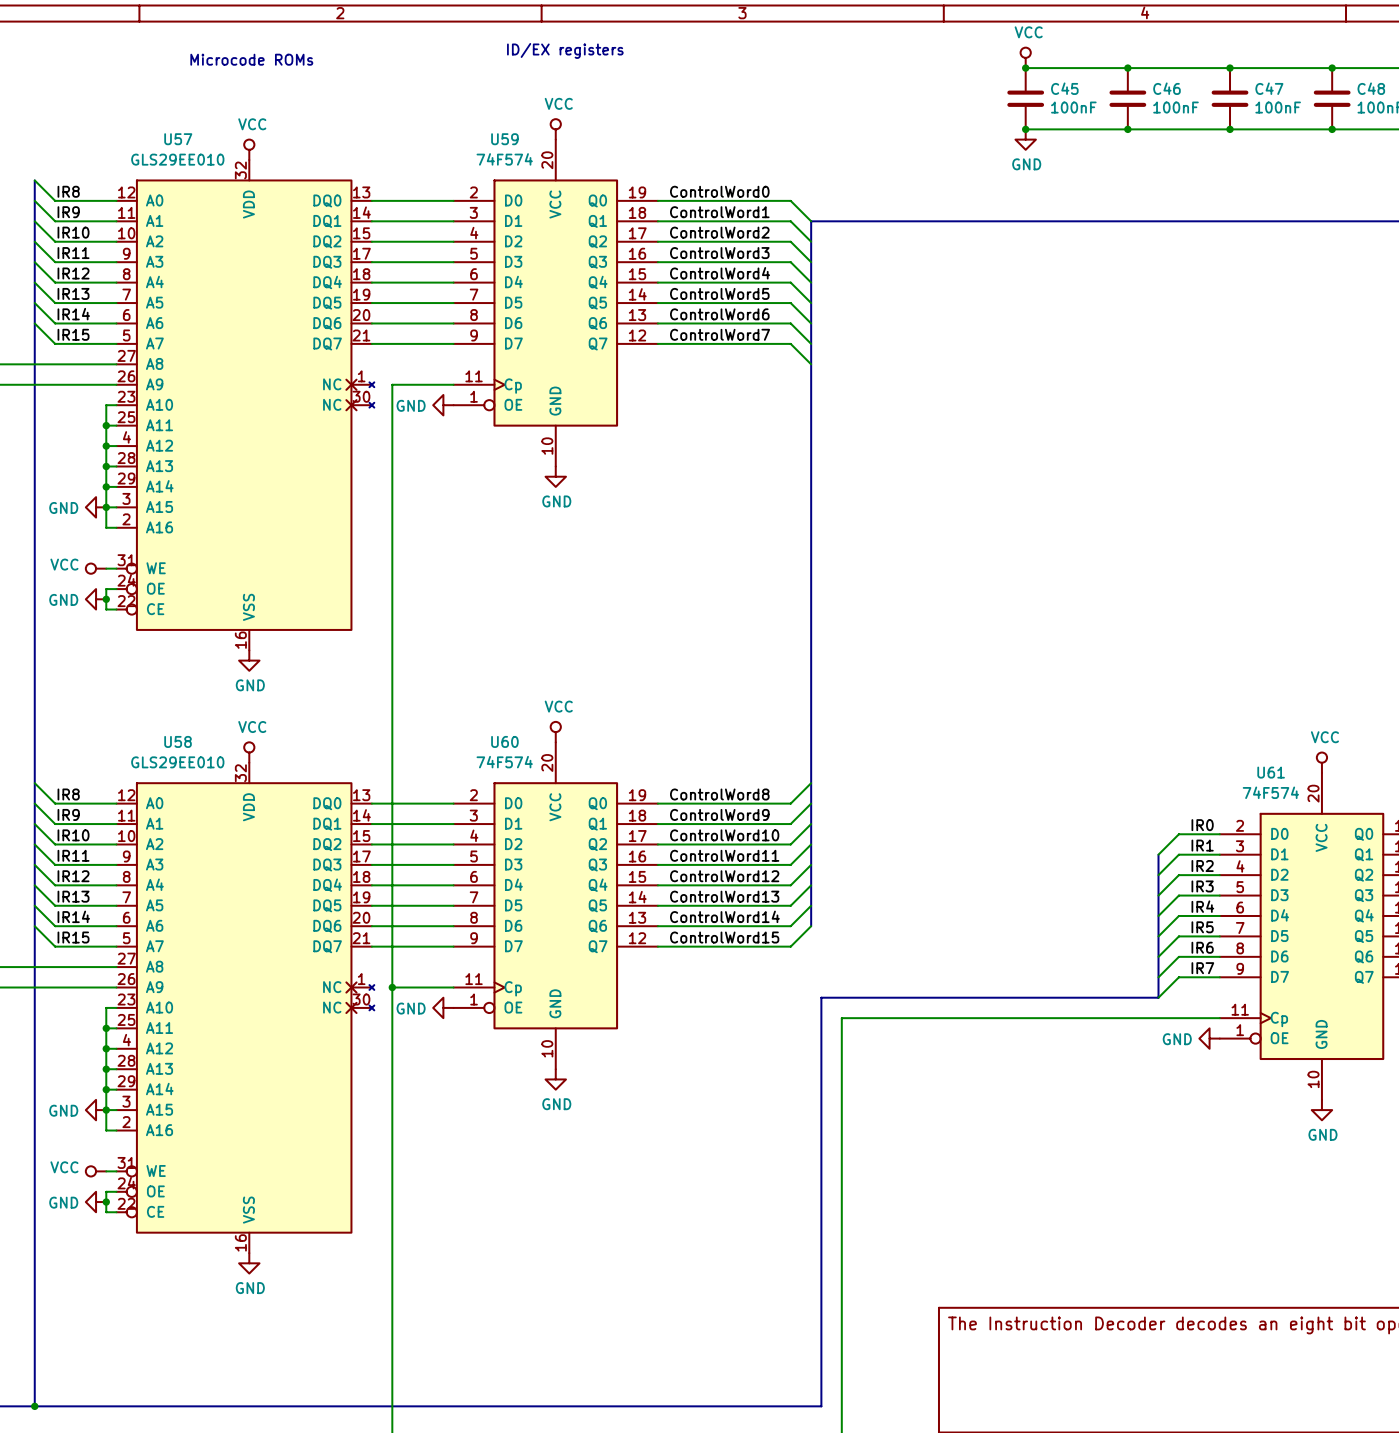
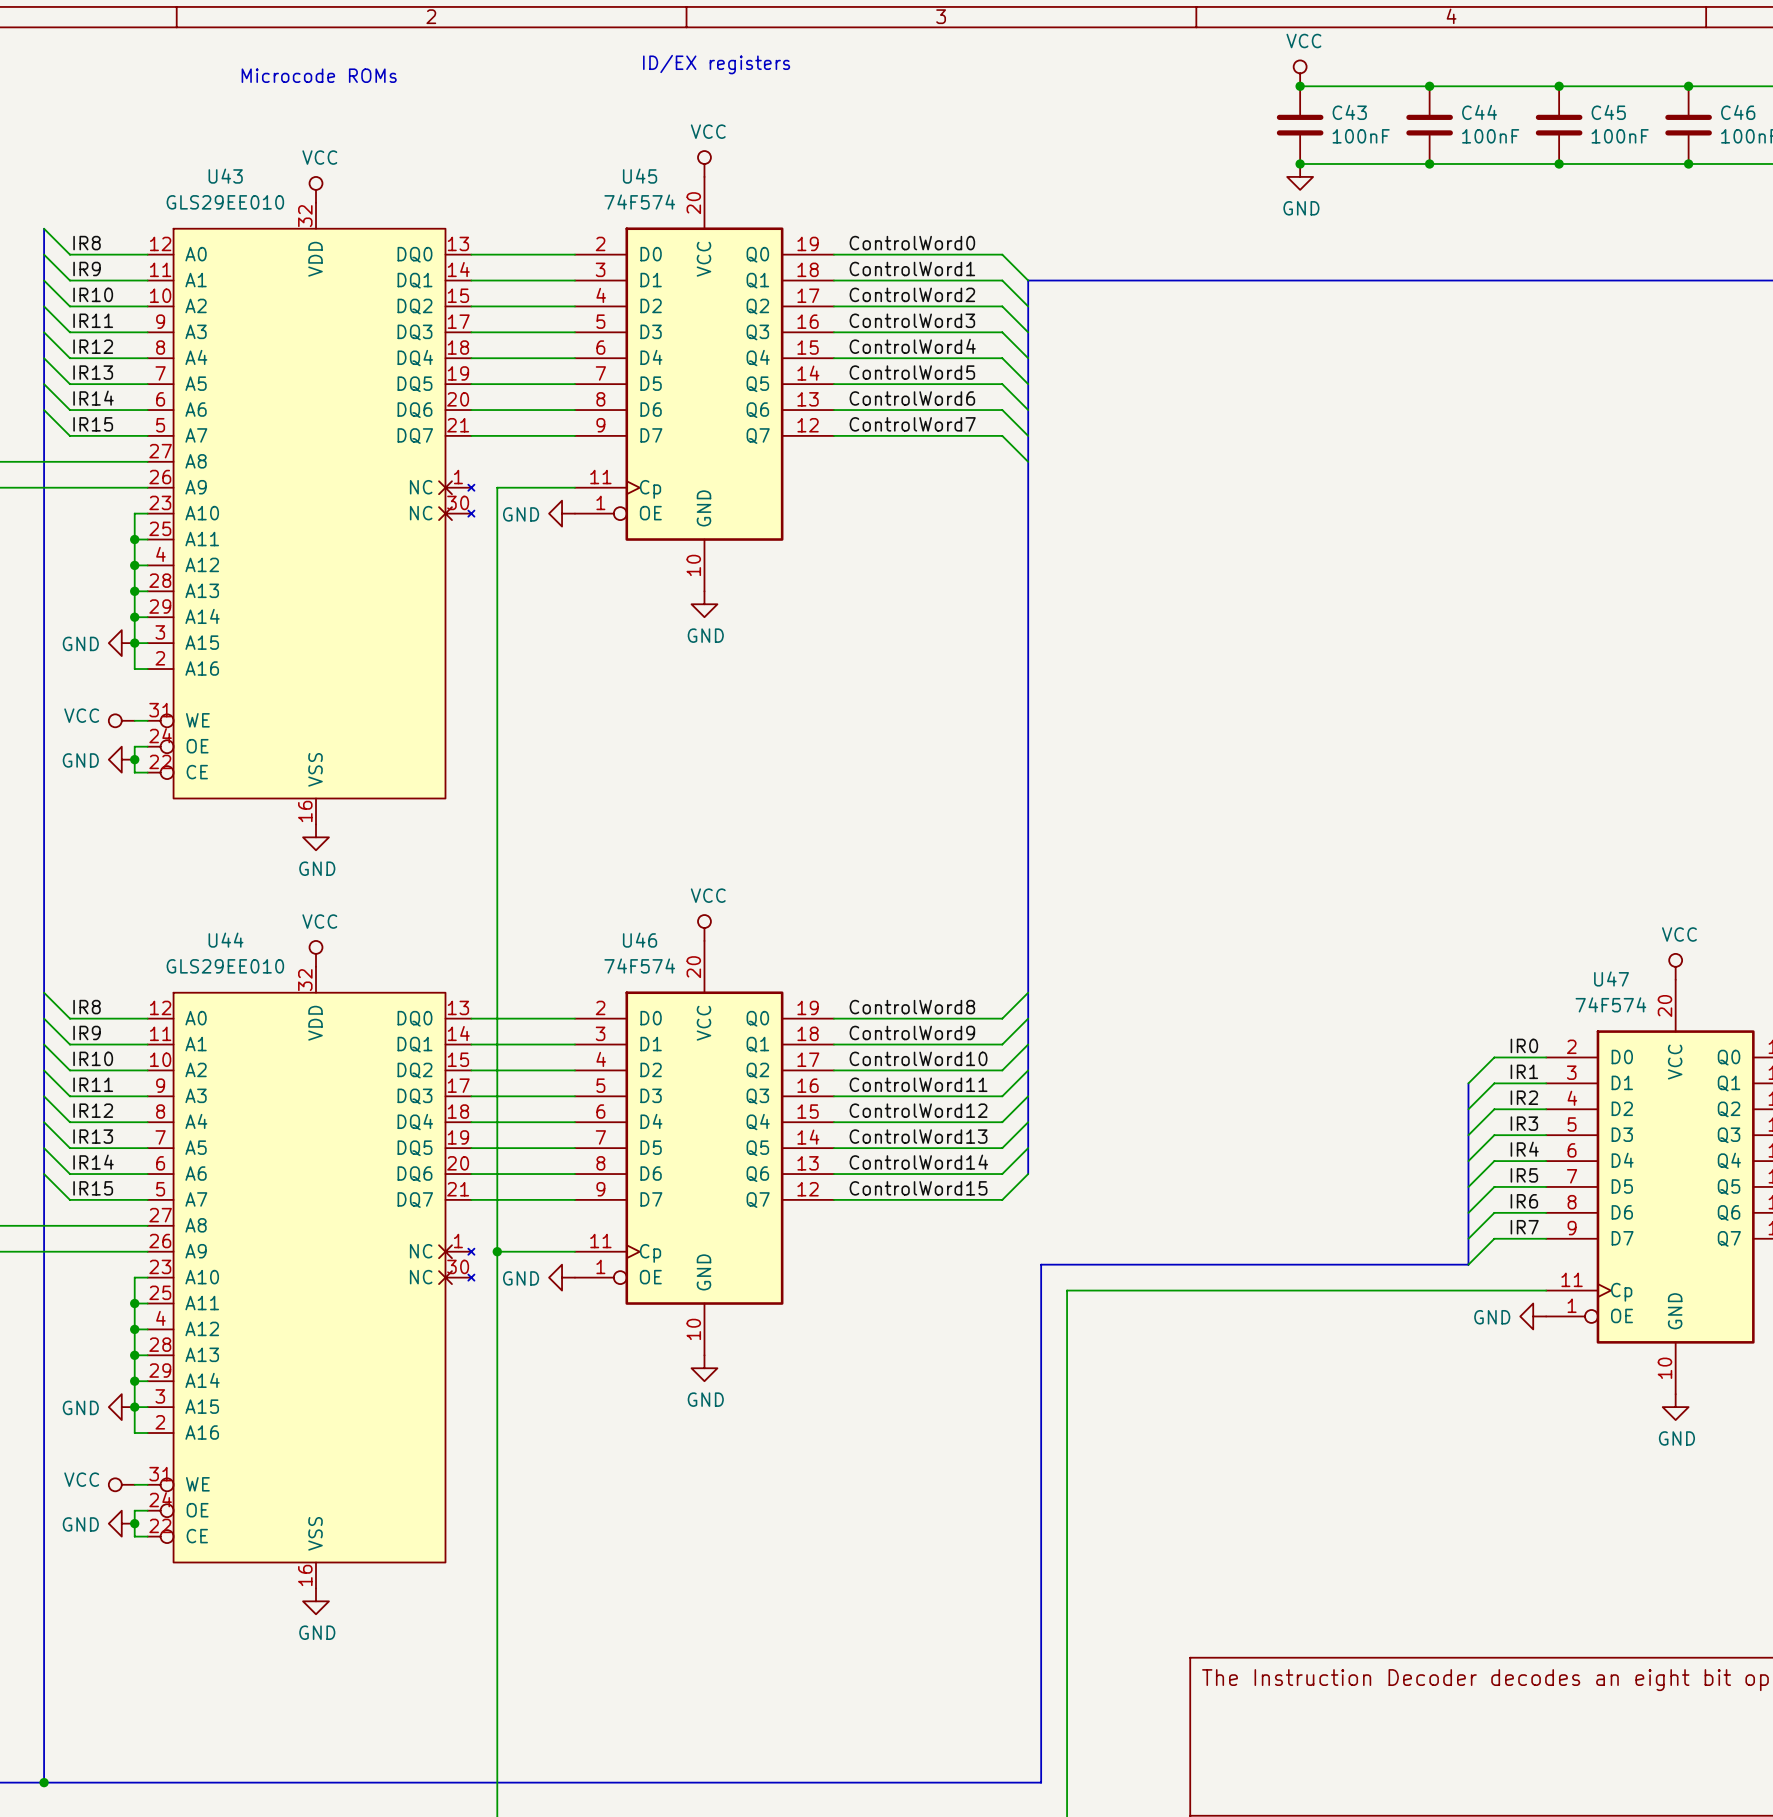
C45 name: C45 (1064, 88) -> C43 (1349, 112)
C46 name: C46 (1166, 88) -> C44 (1479, 112)
C47 name: C47 (1269, 88) -> C45 (1608, 112)
C48 name: C48 (1371, 88) -> C46 (1738, 112)
U57 name: U57 (178, 139) -> U43 (225, 176)
U59 name: U59 (504, 139) -> U45 (640, 176)
U58 name: U58 (178, 741) -> U44 (225, 940)
U60 name: U60 (504, 741) -> U46 (640, 940)
U61 name: U61 (1271, 772) -> U47 (1611, 978)

